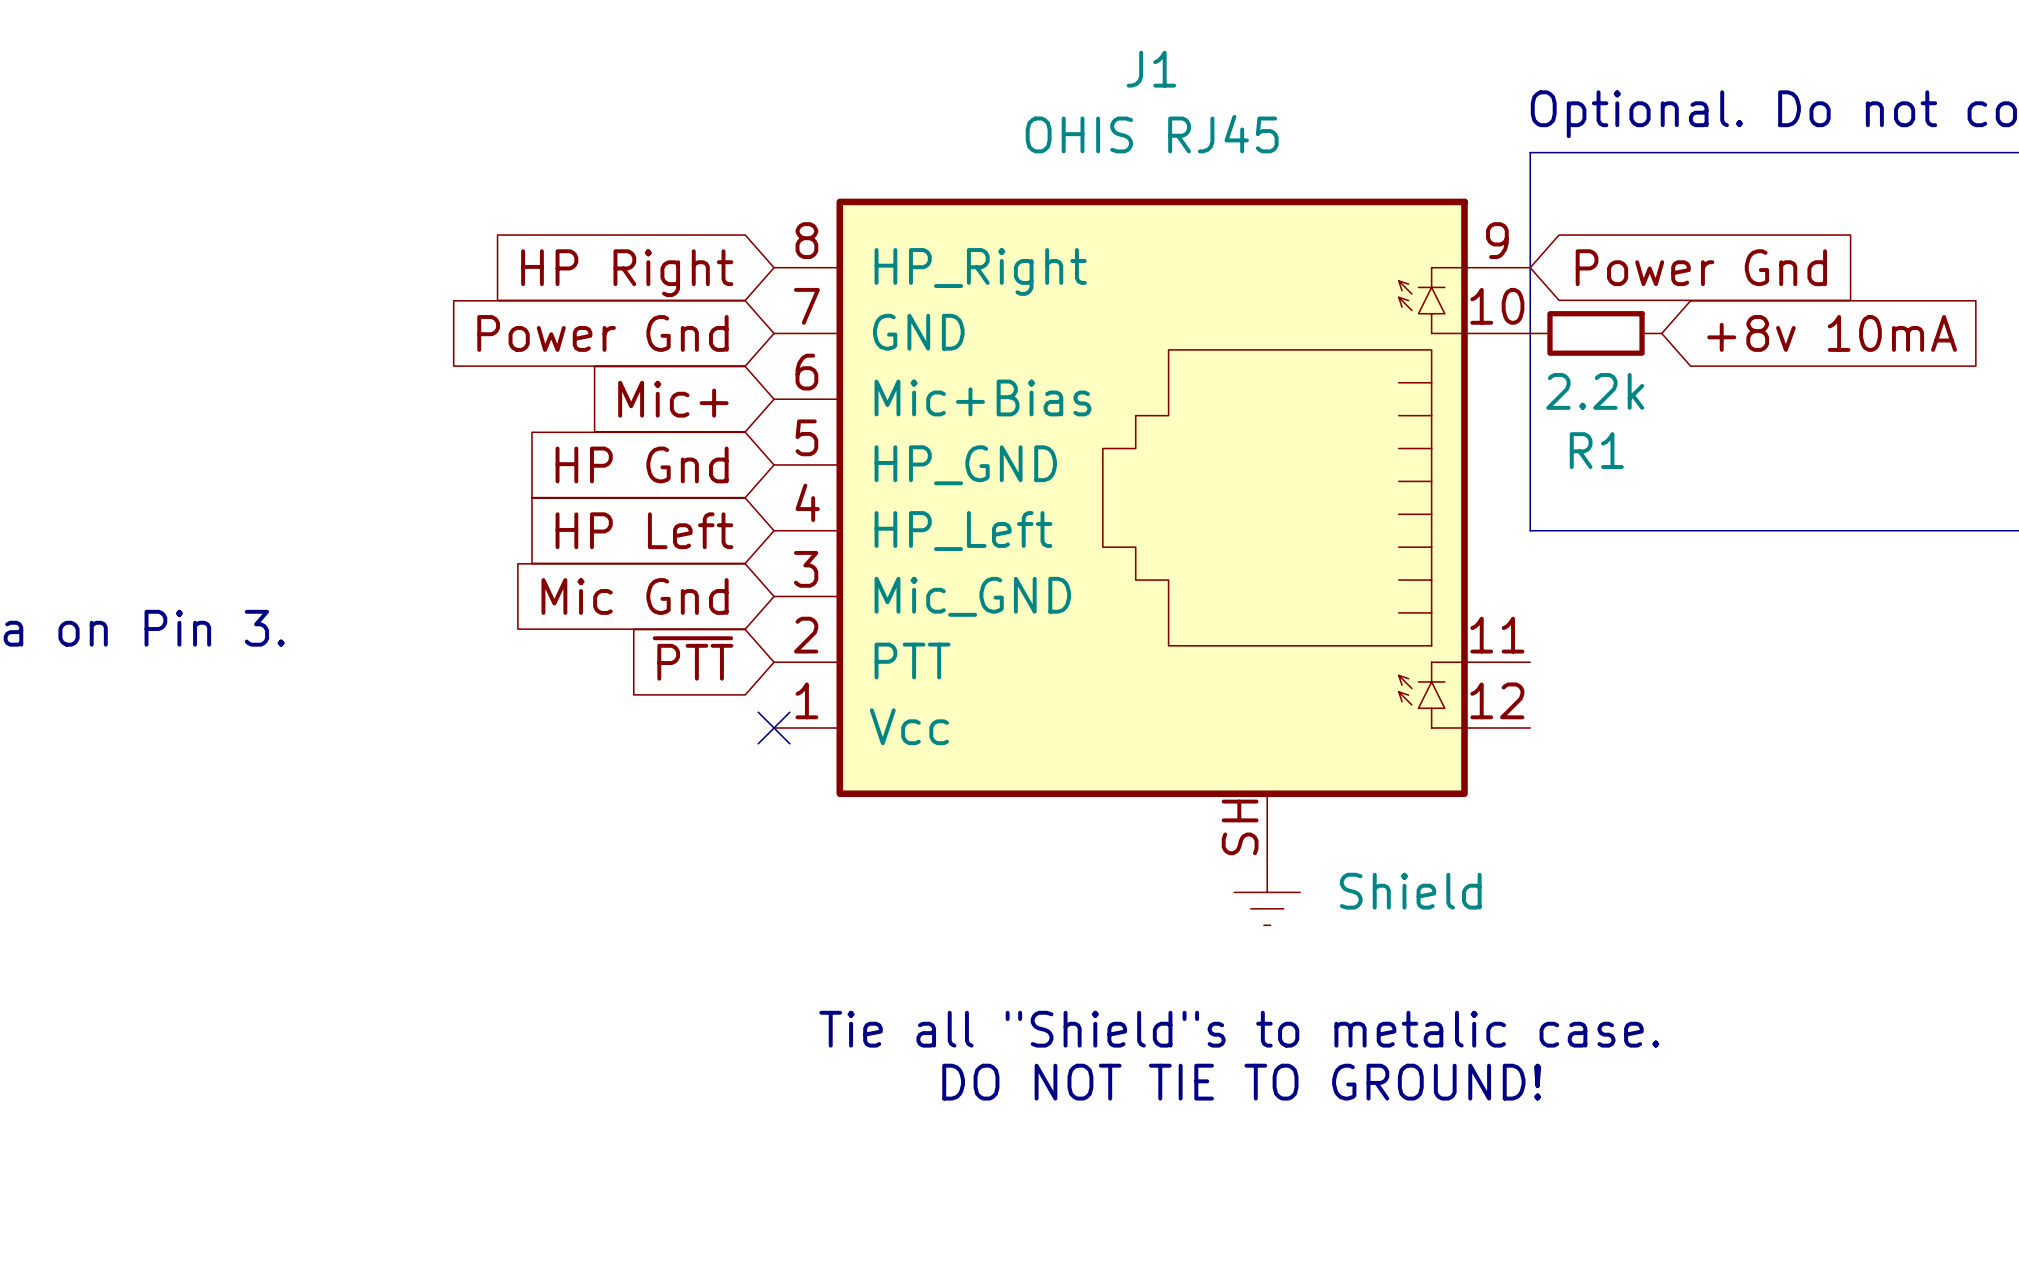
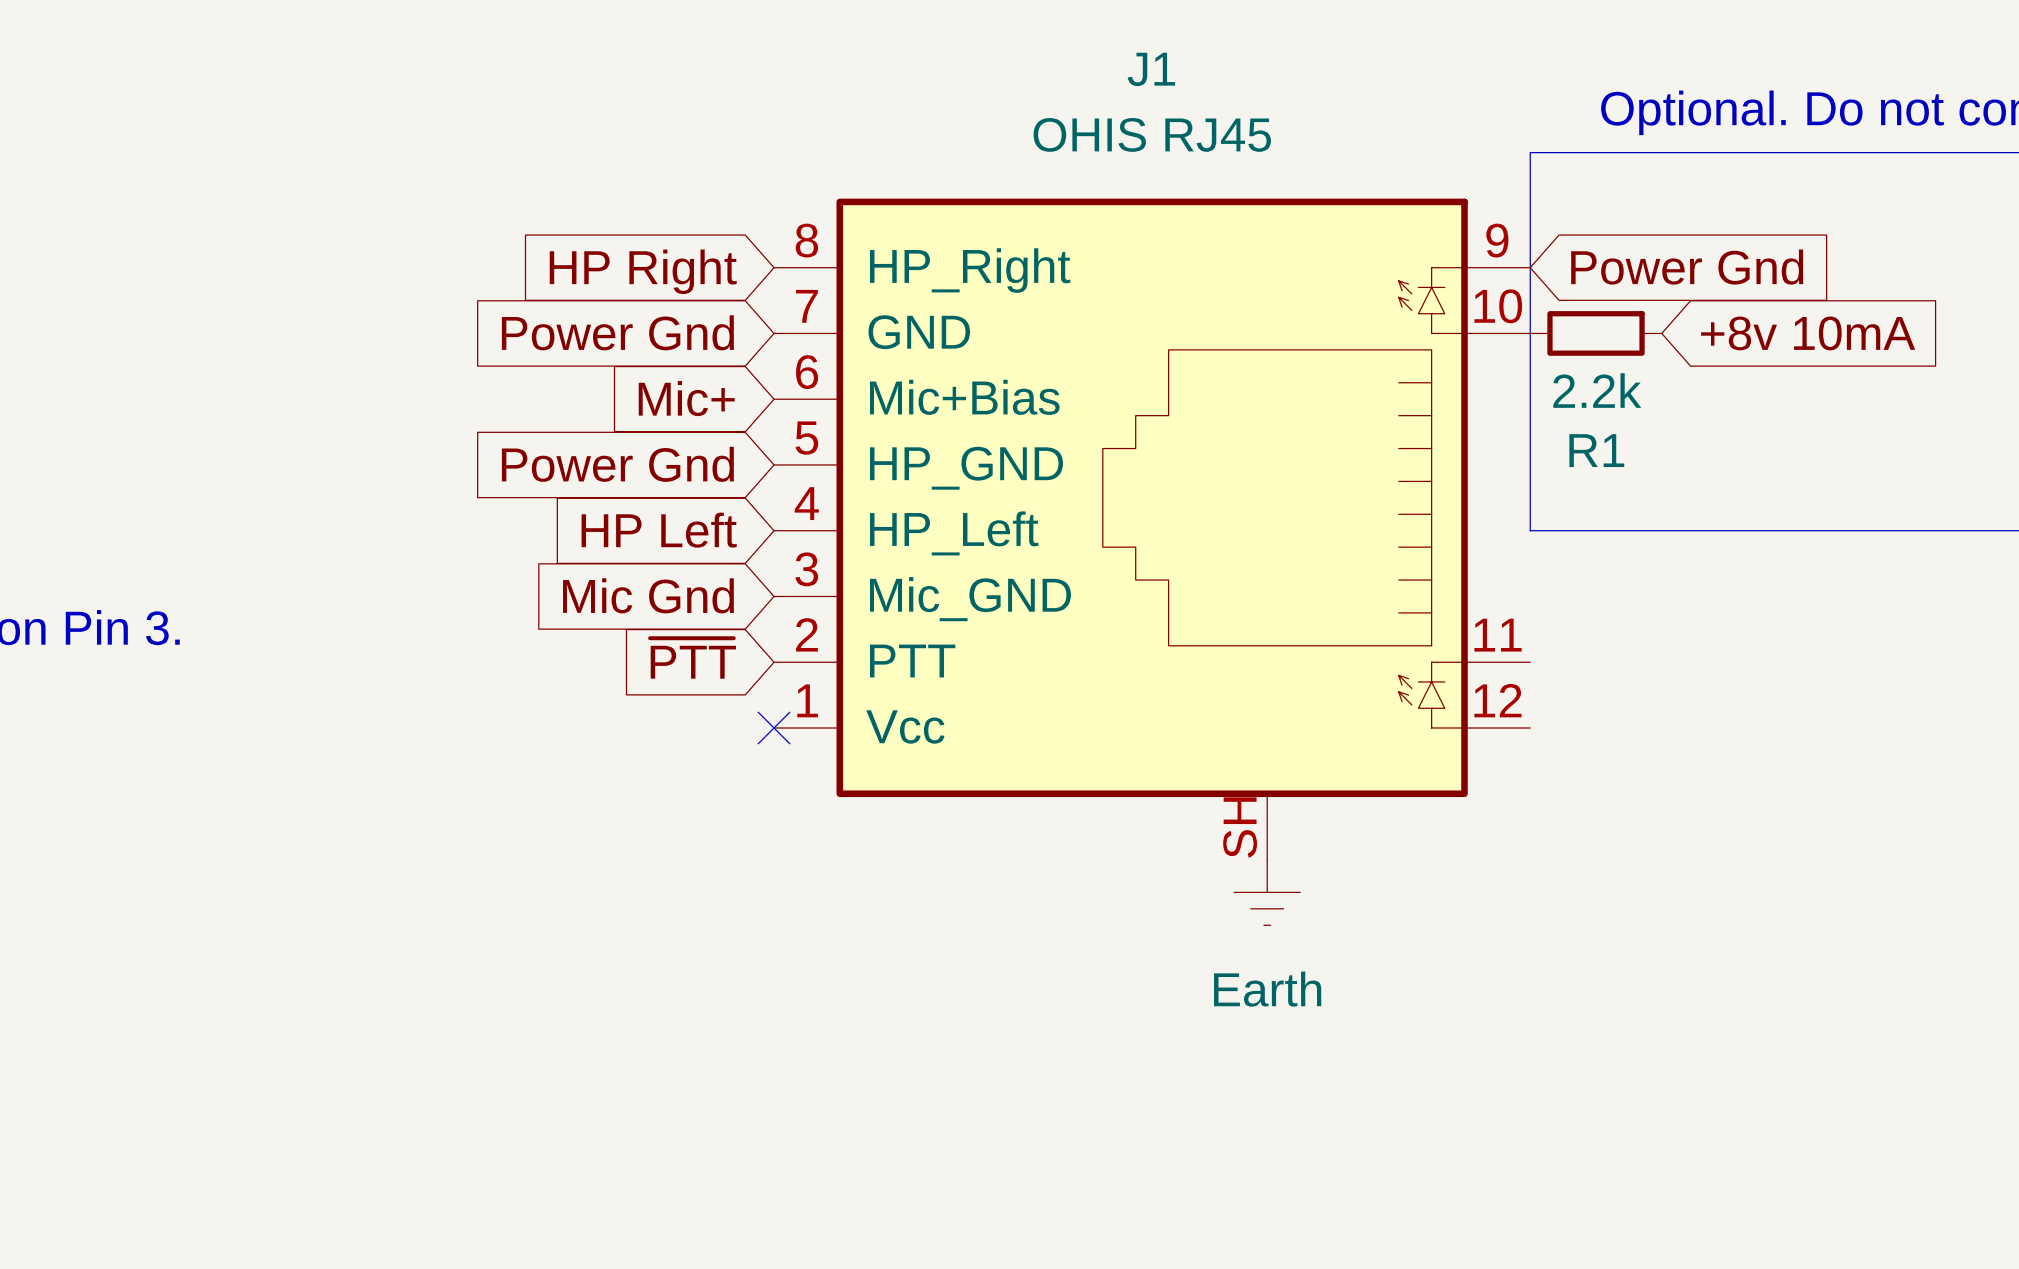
global label: HP Gnd (642, 464) -> Power Gnd (617, 464)
power symbol: Shield (1267, 892) -> Earth (1267, 892)
text: Tie all "Shield"s to metalic case. (1239, 1029) -> none
text: DO NOT TIE TO GROUND! (1241, 1082) -> none

